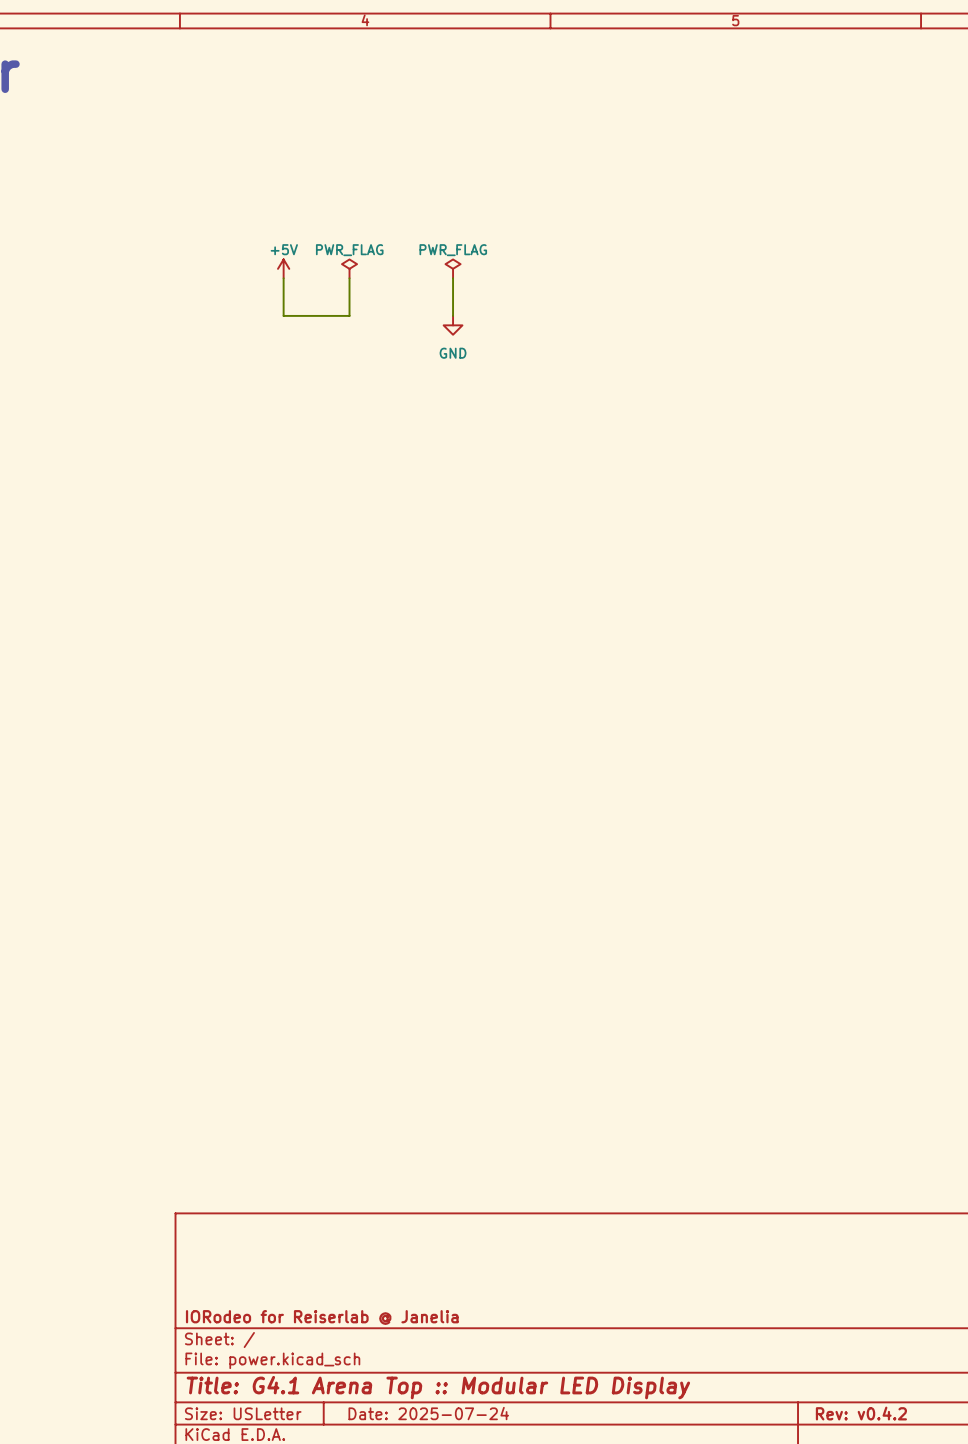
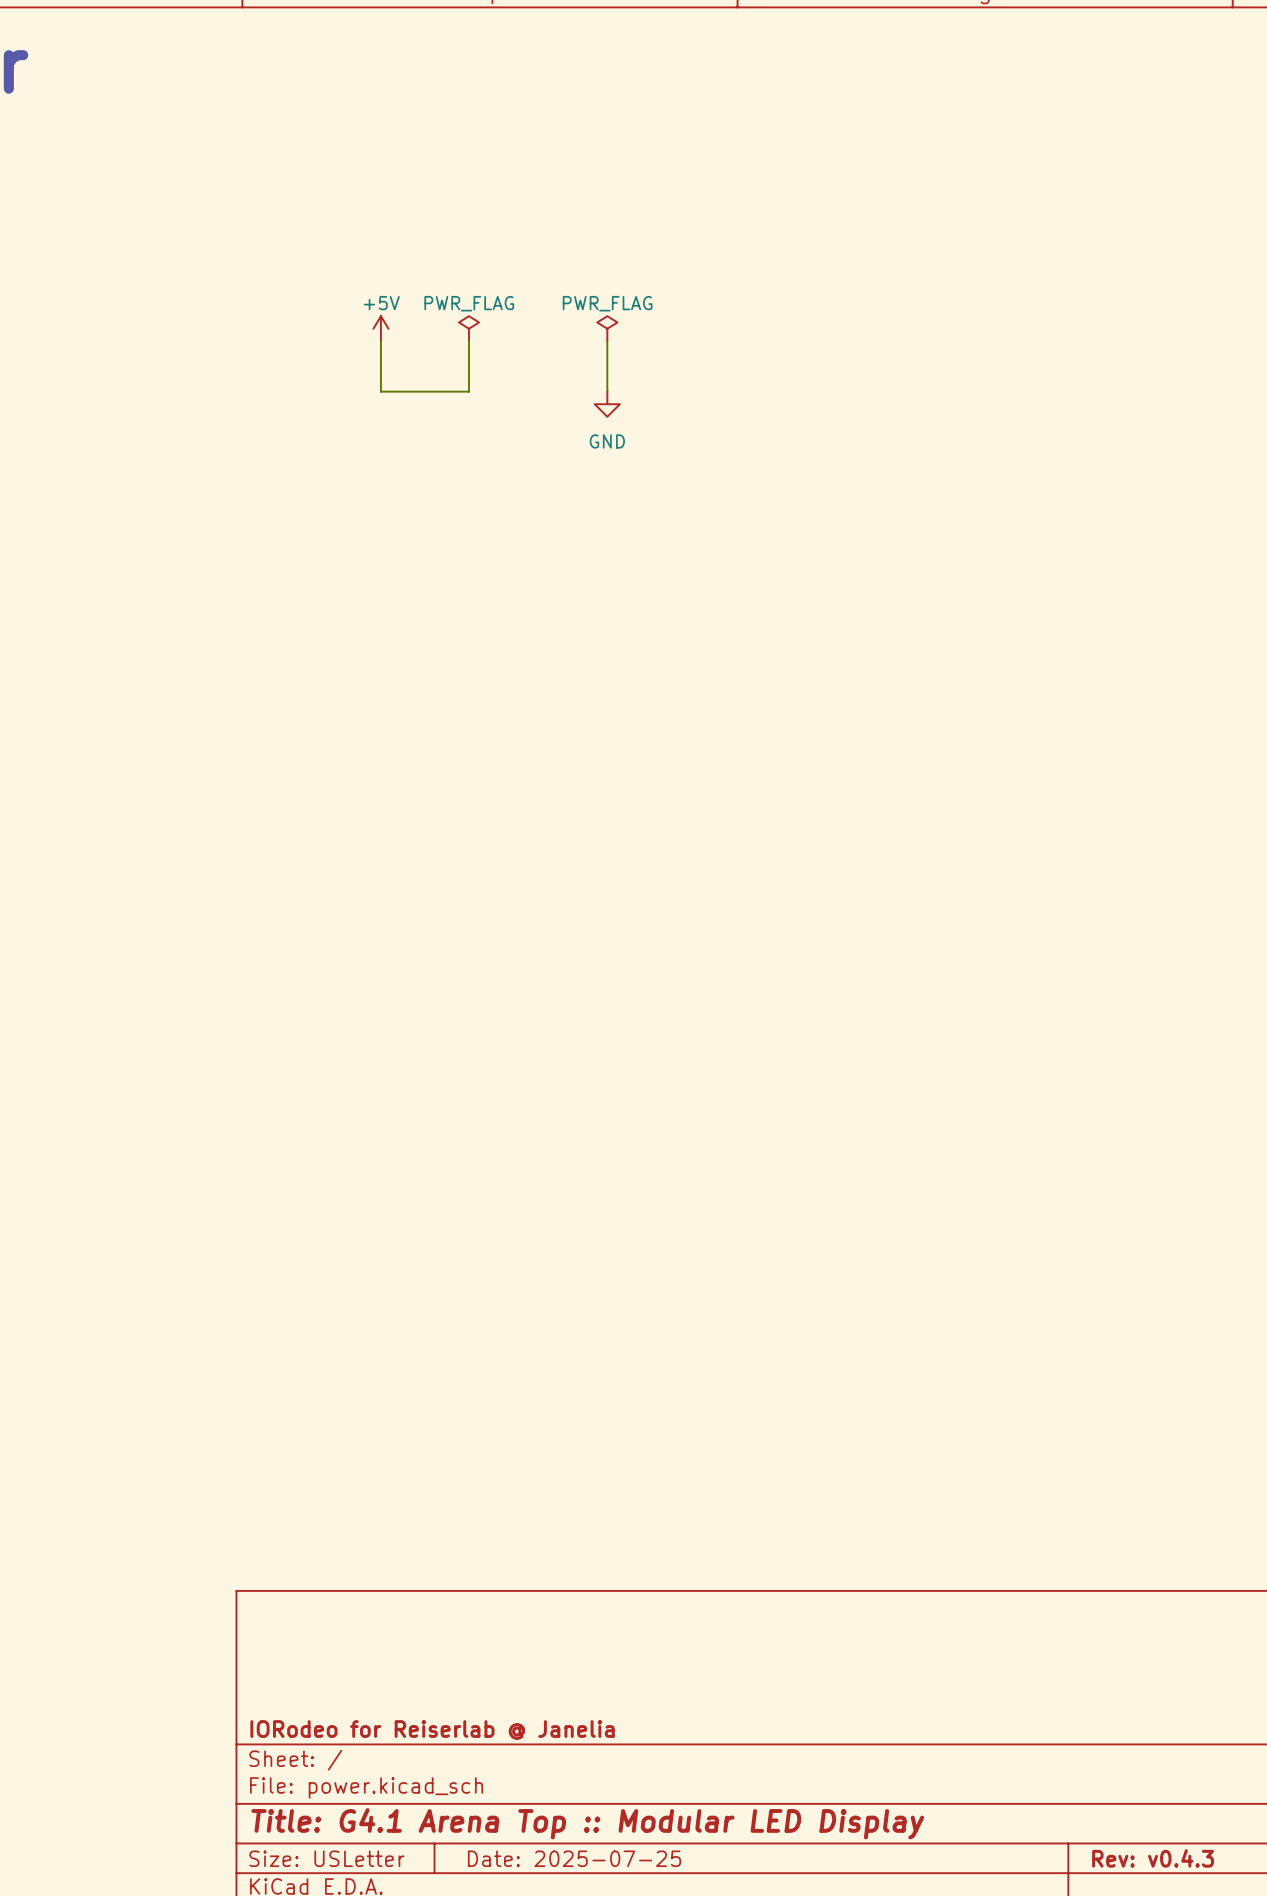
title block: Date: 2025-07-24 (428, 1413) -> Date: 2025-07-25 (574, 1858)
title block: Rev: v0.4.2 (861, 1413) -> Rev: v0.4.3 (1153, 1858)

